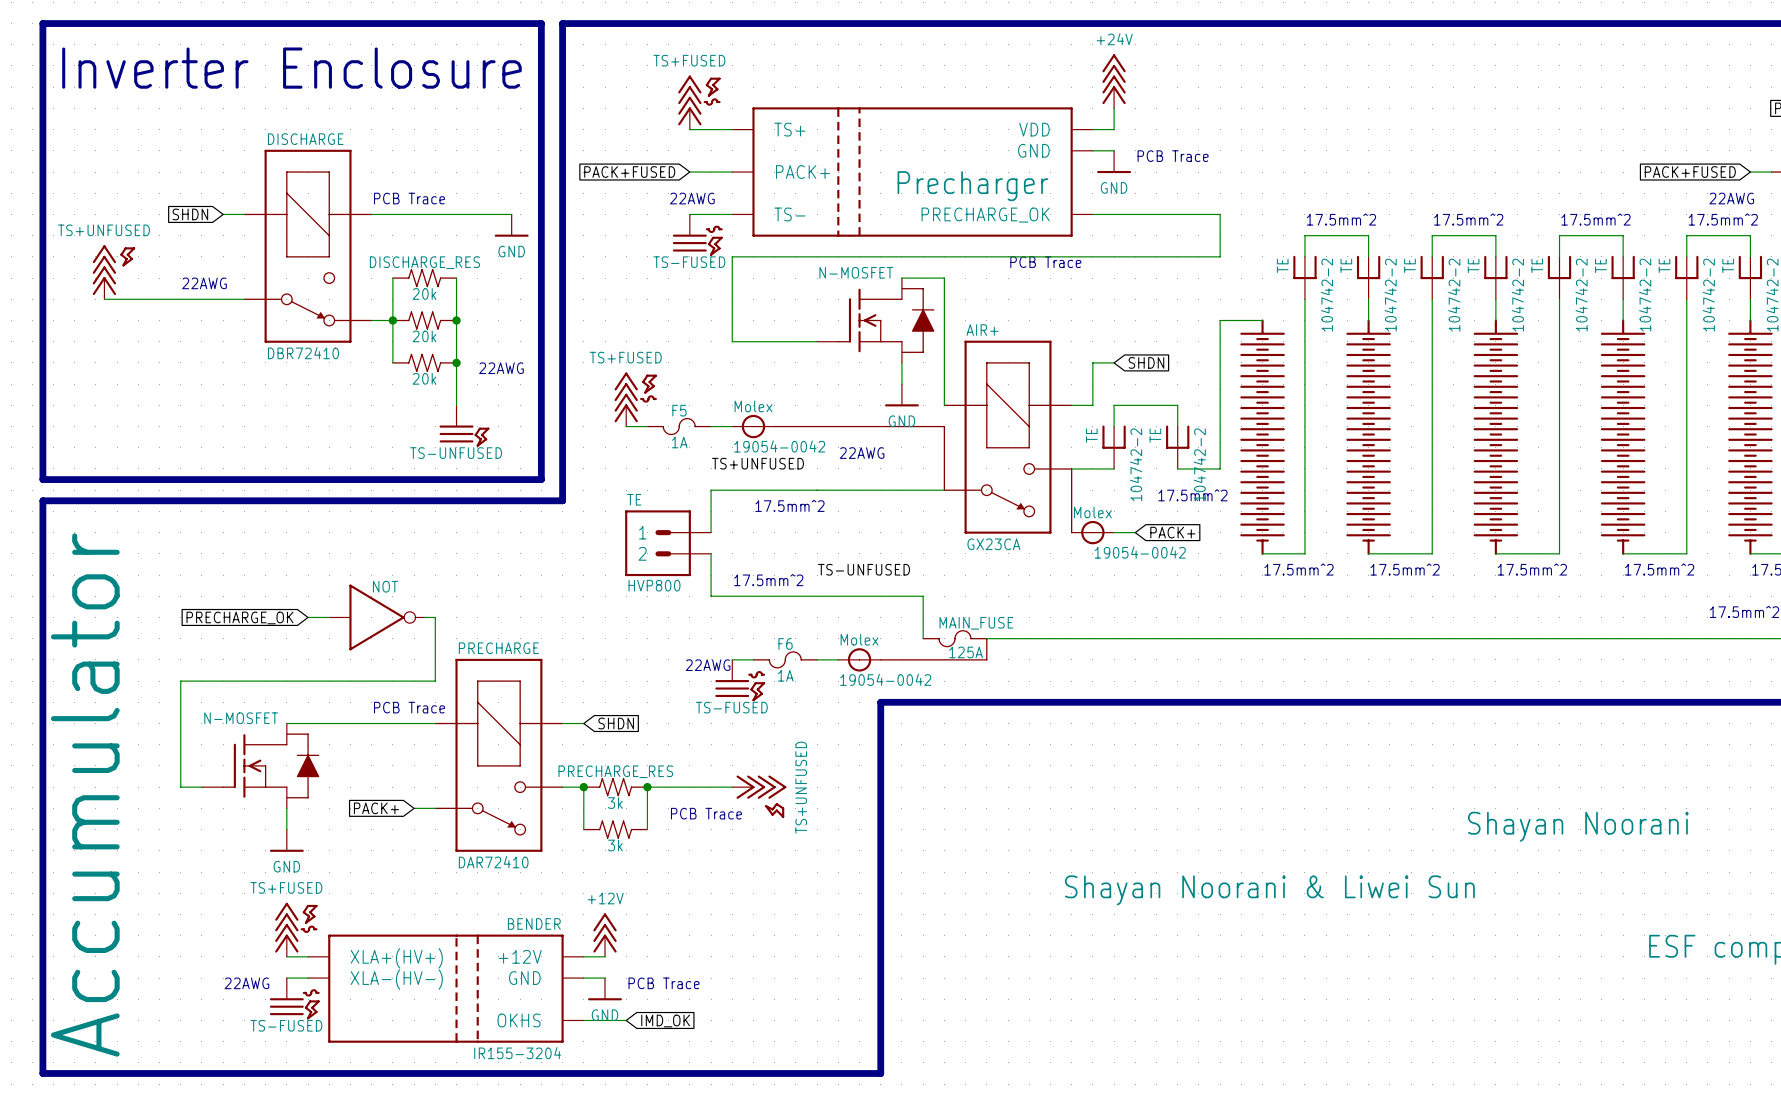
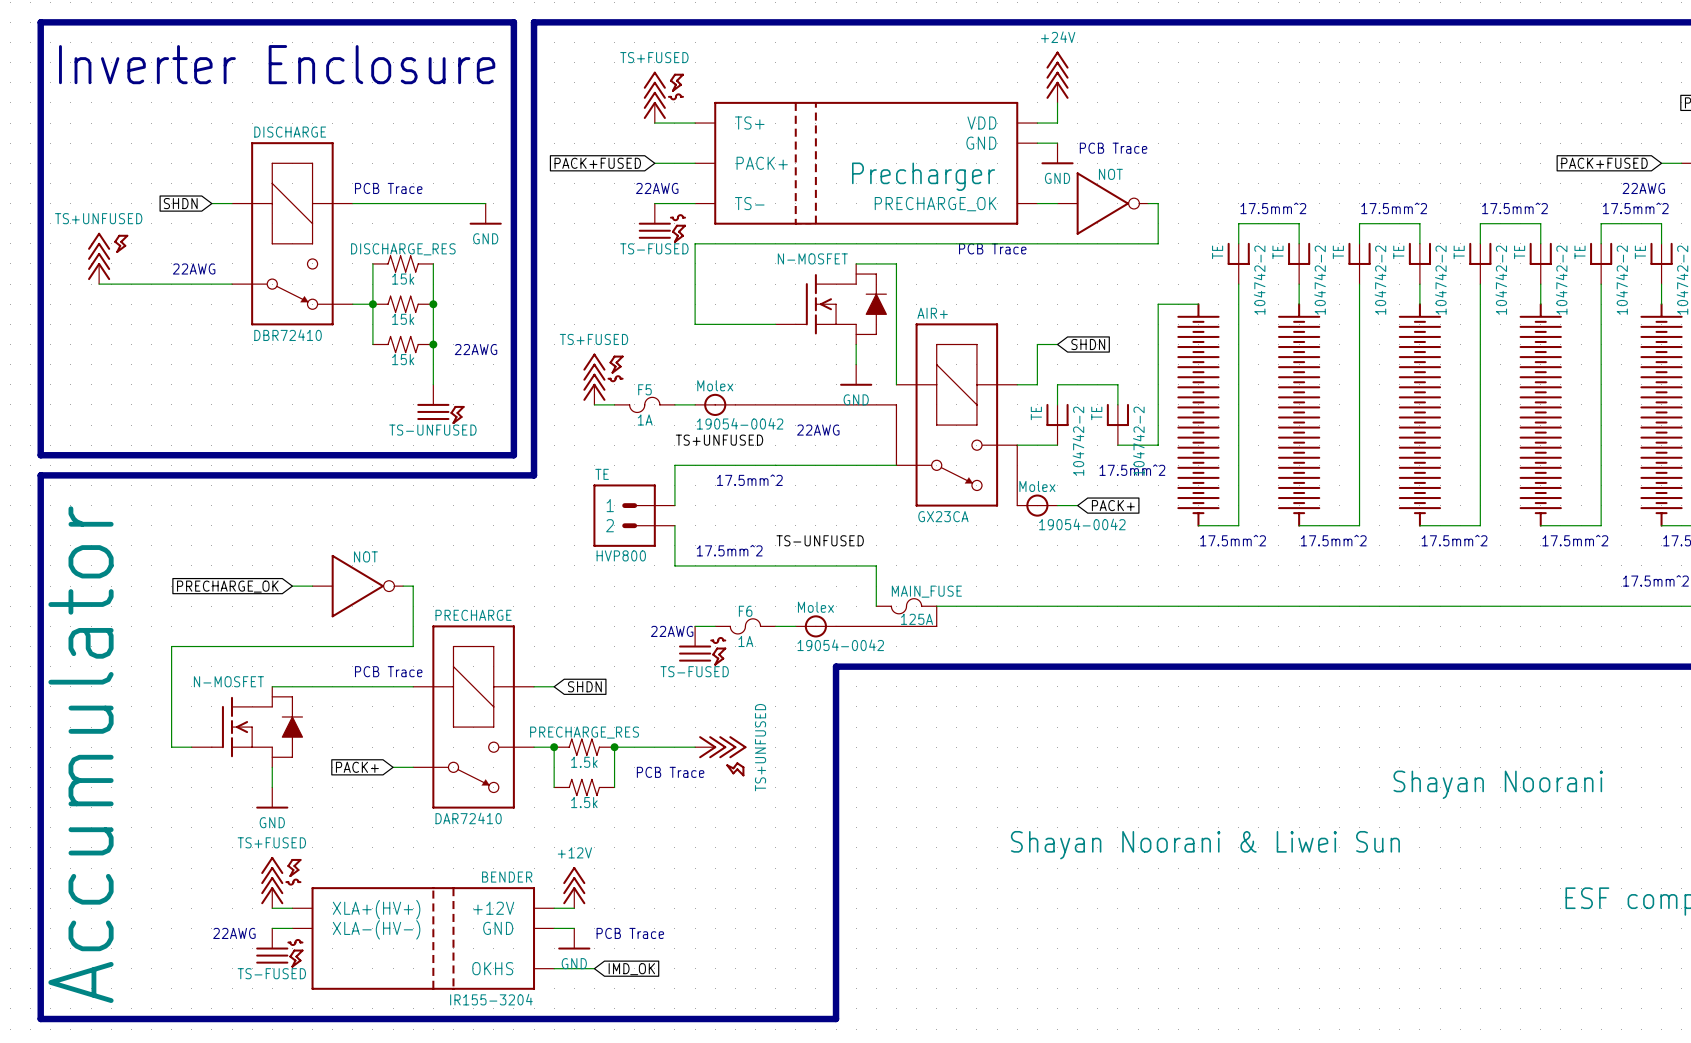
wire: (1114, 214) (1209, 214) -> none
part: none -> (1102, 203)
DISCHARGE_RES value: 20k (424, 293) -> 15k (403, 279)
part value: 20k (424, 336) -> 15k (403, 319)
part value: 20k (424, 378) -> 15k (403, 359)
PRECHARGE_RES value: 3k (615, 803) -> 1.5k (584, 762)
part value: 3k (615, 845) -> 1.5k (584, 802)

